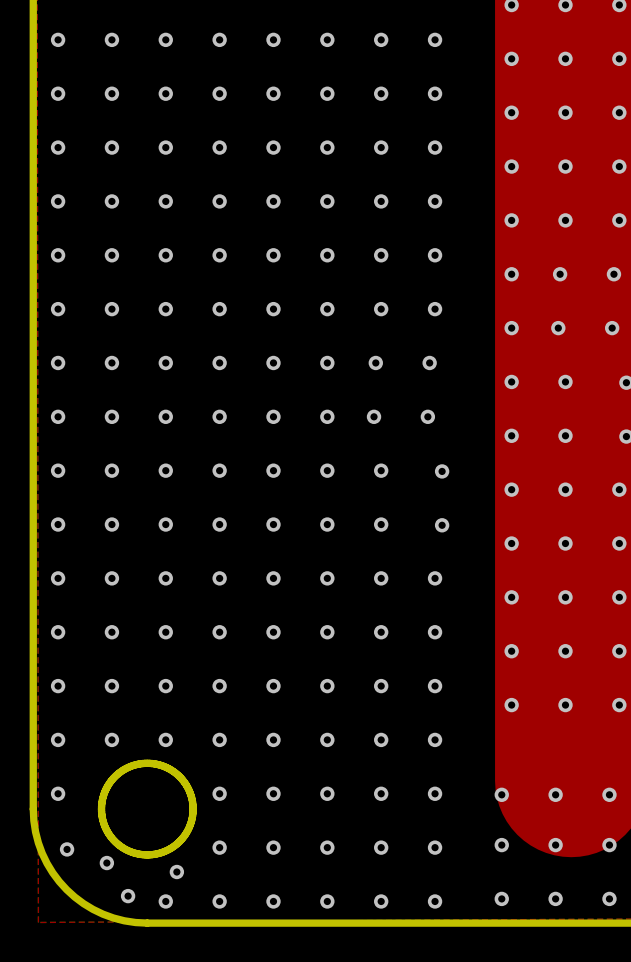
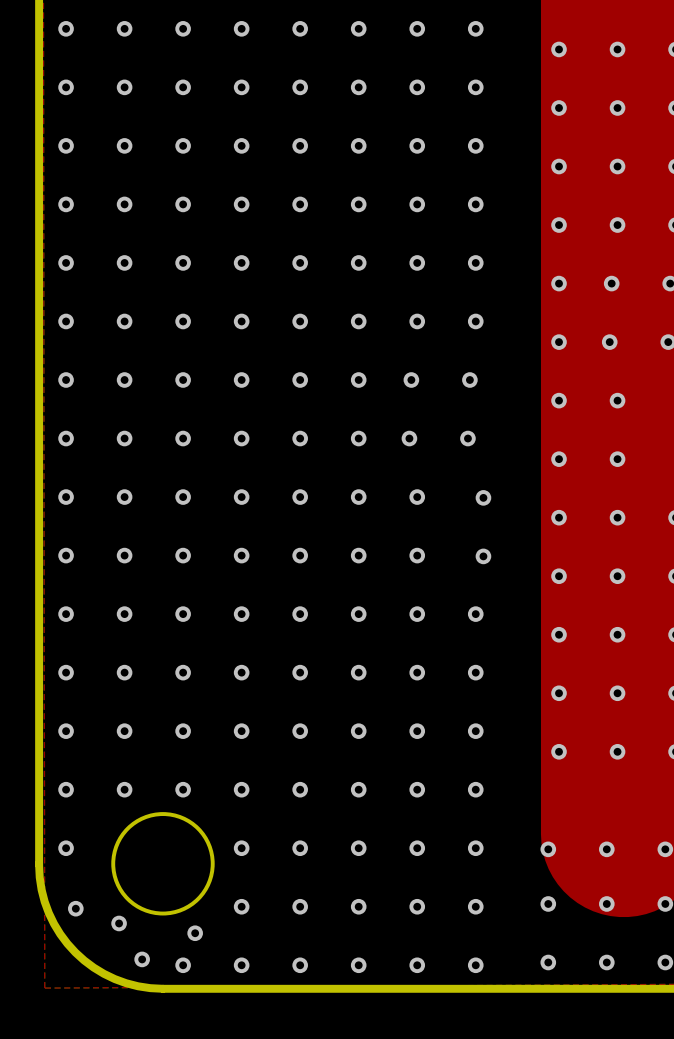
round board edge: none -> [111, 812, 215, 916]
board edge: (147, 763) (129, 766) (114, 776) (105, 791) (101, 809) (105, 826) (114, 841) (129, 851) (147, 854) (165, 851) (179, 841) (189, 826) (193, 809) (189, 791) (179, 776) (165, 766) (147, 763) -> none

